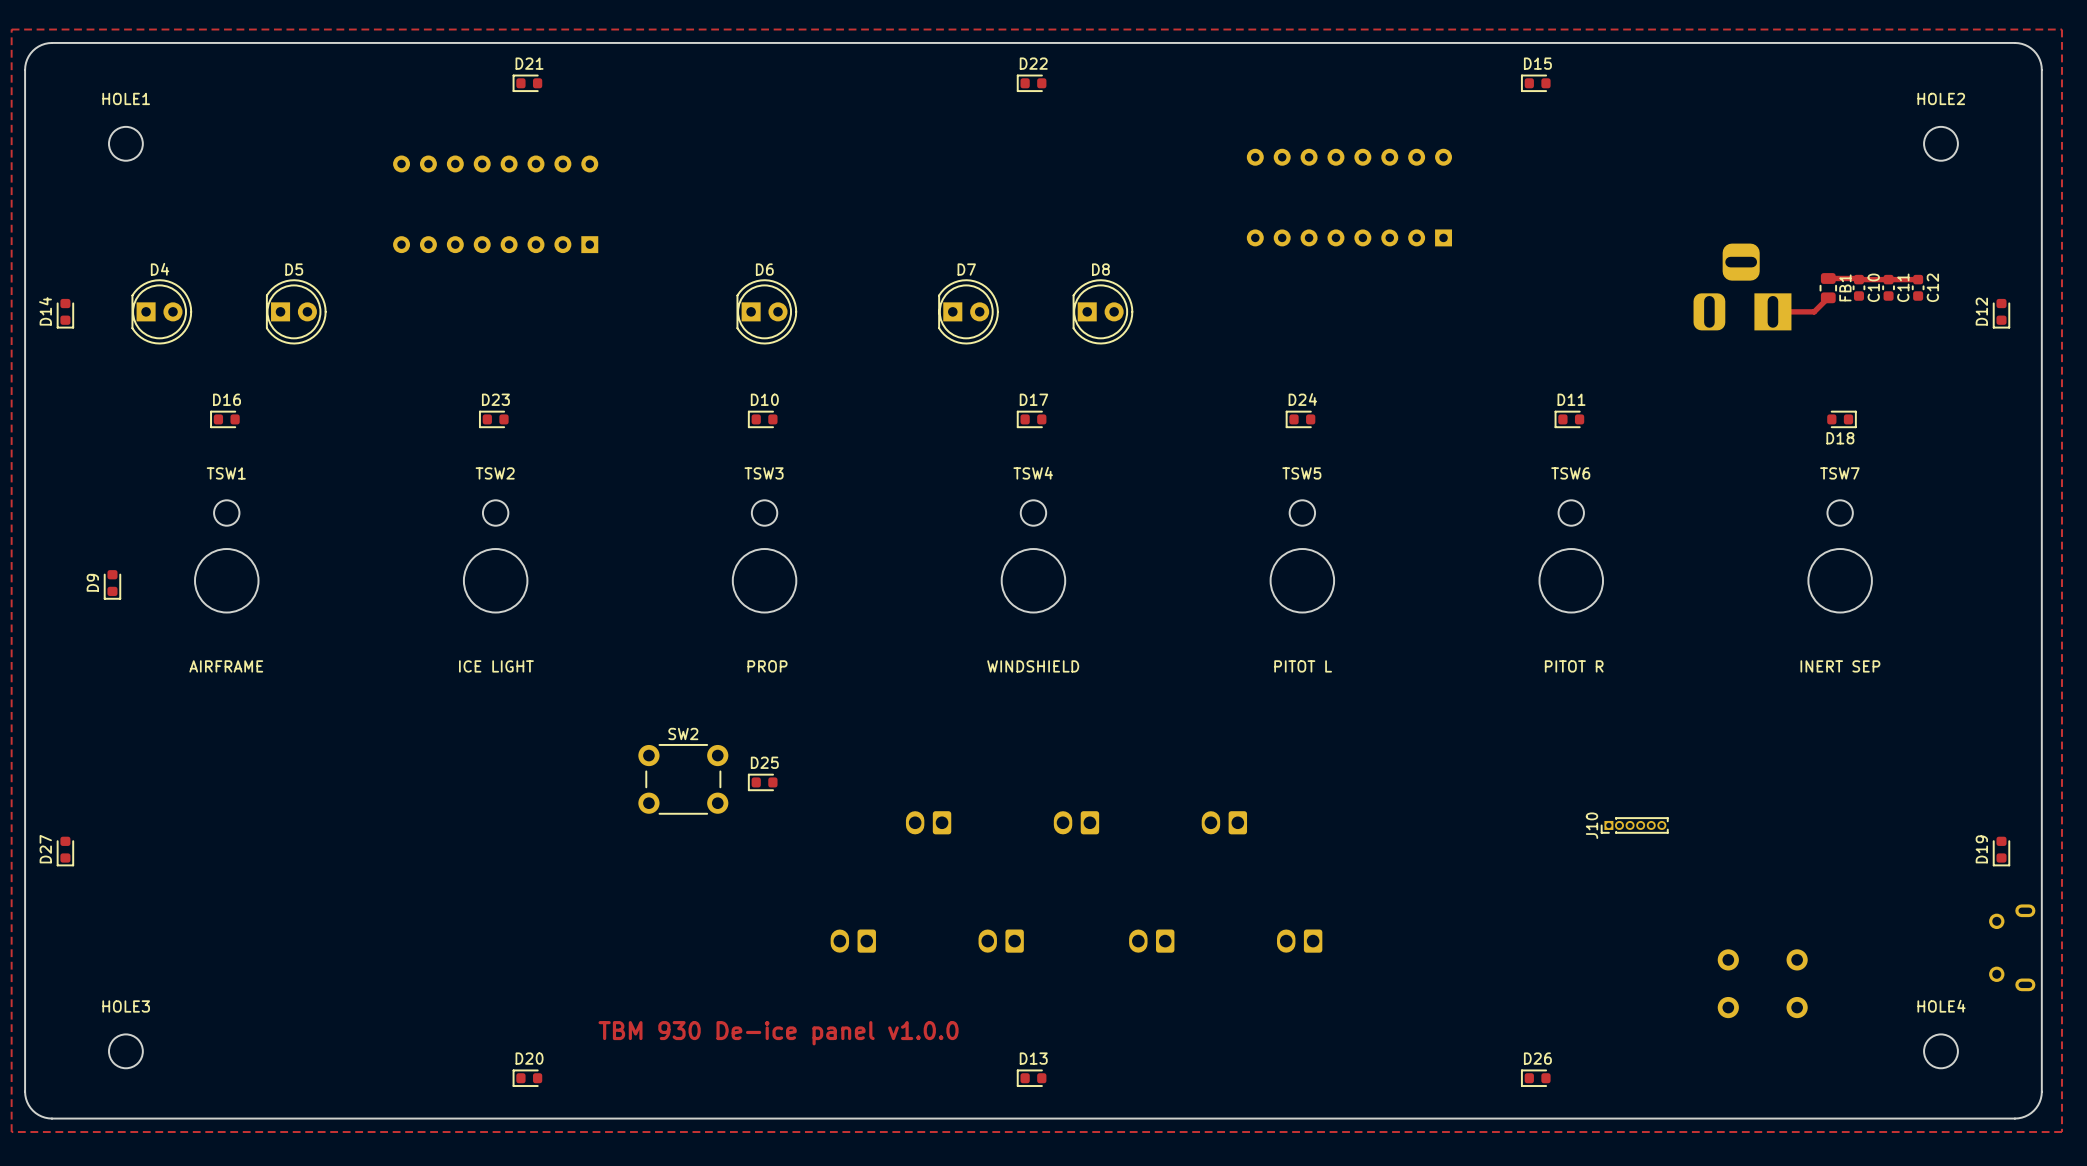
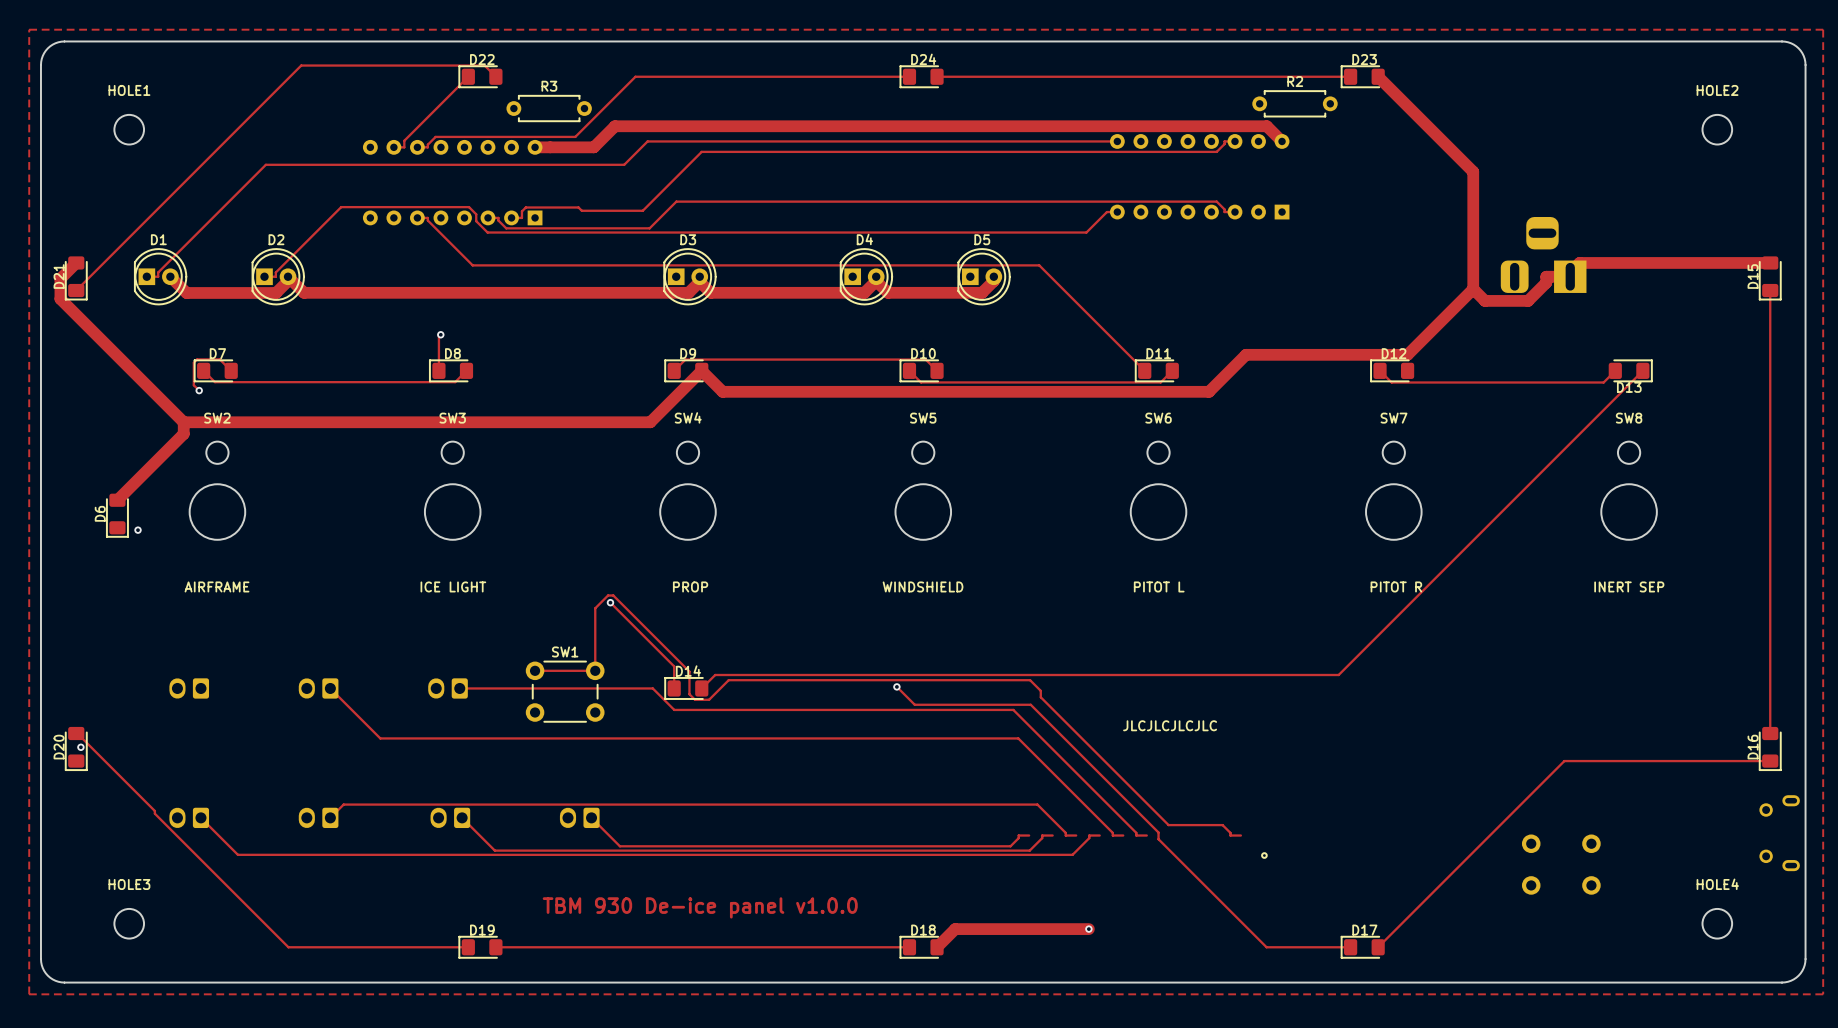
D21 name position: D21 (529, 63) -> D21 (59, 276)
D15 name position: D15 (1537, 63) -> D15 (1753, 276)
D21 footprint: [512, 74, 543, 92] -> [65, 256, 88, 301]
D22 footprint: [1017, 74, 1047, 92] -> [458, 65, 503, 88]
D15 footprint: [1521, 74, 1551, 92] -> [1759, 256, 1782, 301]
track: none -> (468, 76) (404, 140) (404, 147) (393, 147)
track: none -> (495, 76) (484, 65) (301, 65) (76, 290)
track: none -> (909, 76) (635, 76) (575, 136) (435, 136) (427, 144) (427, 147) (417, 147)
track: none -> (937, 76) (1350, 76)
track: none -> (1378, 76) (1473, 171) (1473, 289)
R2: none -> (1294, 103)
R3: none -> (549, 108)
track: none -> (1117, 141) (647, 141) (624, 164) (265, 164) (158, 272) (158, 276) (146, 276)
track: none -> (1235, 141) (1224, 141) (1224, 144) (1216, 151) (701, 151) (642, 210) (581, 210) (578, 207) (525, 207) (521, 211) (521, 217) (511, 217)
track: none -> (1282, 141) (1266, 126) (614, 126) (593, 147) (535, 147)
track: none -> (1117, 212) (1106, 212) (1086, 232) (487, 232) (476, 221) (476, 214) (469, 207) (341, 207) (275, 272) (275, 276) (264, 276)
track: none -> (1235, 212) (1224, 212) (1224, 209) (1216, 201) (676, 201) (649, 228) (506, 228) (498, 220) (498, 217) (488, 217)
track: none -> (417, 217) (427, 217) (427, 220) (472, 265) (1039, 265) (1144, 370)
D4 name: D4 (160, 269) -> D1 (158, 239)
D5 name: D5 (294, 269) -> D2 (276, 239)
D6 name: D6 (764, 269) -> D3 (688, 239)
D7 name: D7 (966, 269) -> D4 (864, 239)
D8 name: D8 (1100, 269) -> D5 (982, 239)
track: (1828, 278) (1918, 279) -> none
C10: (1858, 287) -> none
C11: (1888, 287) -> none
C12: (1918, 287) -> none
FB1: (1828, 288) -> none
track: none -> (76, 262) (60, 278) (60, 298) (183, 422)
track: none -> (1770, 262) (1579, 262) (1565, 276)
track: (1828, 297) (1814, 311) (1772, 311) -> (1473, 289) (1485, 300) (1528, 300) (1546, 282) (1546, 276) (1570, 276)
D14 footprint: [57, 298, 74, 329] -> [664, 677, 709, 700]
D12 footprint: [1993, 298, 2010, 329] -> [1370, 359, 1415, 382]
D14 name position: D14 (45, 311) -> D14 (688, 671)
track: none -> (170, 276) (186, 292) (276, 292) (290, 278)
track: none -> (288, 276) (304, 292) (688, 292) (699, 281)
track: none -> (993, 276) (993, 281) (982, 292) (887, 292) (876, 281)
D12 name position: D12 (1981, 311) -> D12 (1394, 353)
track: none -> (876, 281) (864, 292) (710, 292) (699, 281)
track: none -> (1473, 289) (1407, 354) (1246, 354) (1209, 391) (722, 391) (701, 370) (650, 422) (183, 422)
track: none -> (1770, 290) (1770, 733)
track: none -> (440, 334) (438, 336) (438, 370)
via: none -> (440, 334)
D16 name position: D16 (227, 399) -> D16 (1753, 747)
D16 footprint: [210, 411, 240, 428] -> [1759, 726, 1782, 771]
D23 footprint: [479, 411, 509, 428] -> [1341, 65, 1385, 88]
D10 footprint: [748, 411, 778, 428] -> [899, 359, 944, 382]
D17 footprint: [1017, 411, 1047, 428] -> [1341, 936, 1385, 959]
D24 footprint: [1286, 411, 1316, 428] -> [899, 65, 944, 88]
D11 footprint: [1554, 411, 1585, 428] -> [1135, 359, 1179, 382]
D18 footprint: [1827, 411, 1857, 428] -> [899, 936, 944, 959]
track: none -> (203, 370) (214, 382) (455, 382) (466, 370)
D7: none -> (215, 370)
track: none -> (231, 370) (219, 359) (197, 359) (193, 362) (193, 385) (199, 390)
D8: none -> (451, 370)
track: none -> (674, 370) (685, 359) (925, 359) (937, 370)
track: none -> (909, 370) (921, 382) (1160, 382) (1172, 370)
track: none -> (1380, 370) (1391, 382) (1603, 382) (1615, 370)
track: none -> (1642, 370) (1338, 675) (715, 675) (701, 688)
D18 name position: D18 (1840, 438) -> D18 (923, 930)
via: none -> (199, 390)
TSW1 name: TSW1 (226, 473) -> SW2 (217, 418)
TSW2 name: TSW2 (495, 473) -> SW3 (452, 418)
TSW3 name: TSW3 (764, 473) -> SW4 (688, 417)
TSW4 name: TSW4 (1033, 473) -> SW5 (923, 418)
TSW5 name: TSW5 (1301, 473) -> SW6 (1158, 418)
TSW6 name: TSW6 (1570, 473) -> SW7 (1394, 418)
TSW7 name: TSW7 (1839, 473) -> SW8 (1629, 418)
track: none -> (183, 422) (183, 433) (117, 500)
D9 footprint: [104, 570, 121, 600] -> [664, 359, 709, 382]
D9 name position: D9 (92, 582) -> D9 (688, 353)
D6: none -> (117, 515)
via: none -> (138, 530)
track: none -> (610, 602) (674, 666) (674, 688)
via: none -> (610, 602)
track: none -> (535, 670) (595, 670) (595, 608) (608, 595) (613, 595) (689, 671) (689, 694) (695, 699) (709, 699) (728, 680) (1030, 680) (1040, 690) (1040, 697) (1168, 825) (1222, 825) (1230, 832) (1230, 835) (1240, 835)
SW2: (683, 779) -> none
track: none -> (896, 686) (914, 704) (1030, 704) (1158, 832) (1158, 839) (1266, 947) (1350, 947)
via: none -> (896, 686)
part: none -> (189, 688)
part: none -> (318, 688)
track: none -> (330, 688) (380, 738) (1018, 738) (1112, 832) (1112, 835) (1123, 835)
part: none -> (448, 688)
track: none -> (459, 688) (652, 688) (674, 709) (1013, 709) (1136, 832) (1136, 835) (1146, 835)
D25: (762, 782) -> none
SW1: none -> (565, 691)
part: (928, 822) -> none
part: (1076, 822) -> none
part: (1224, 822) -> none
text: none -> JLCJLCJLCJLC (1170, 725)
J10: (1634, 825) -> none
track: none -> (76, 733) (288, 947) (468, 947)
D19 footprint: [1993, 836, 2010, 867] -> [458, 936, 503, 959]
via: none -> (80, 747)
D19 name position: D19 (1981, 849) -> D19 (482, 930)
D27: (65, 851) -> none
track: none -> (1770, 761) (1564, 761) (1378, 947)
part: none -> (189, 817)
track: none -> (200, 817) (237, 854) (1072, 854) (1089, 838) (1089, 835) (1099, 835)
part: none -> (318, 817)
track: none -> (330, 817) (343, 804) (1037, 804) (1065, 832) (1065, 835) (1076, 835)
part: none -> (450, 817)
track: none -> (462, 817) (494, 850) (1029, 850) (1042, 838) (1042, 835) (1052, 835)
part: none -> (579, 817)
track: none -> (591, 817) (619, 846) (1010, 846) (1018, 838) (1018, 835) (1029, 835)
part: (853, 941) -> none
part: (1001, 941) -> none
part: (1151, 941) -> none
part: (1299, 941) -> none
drawing: none -> [1261, 852, 1268, 859]
track: none -> (1088, 929) (955, 929) (937, 947)
via: none -> (1088, 929)
D20 name position: D20 (529, 1058) -> D20 (59, 747)
D13 name position: D13 (1033, 1058) -> D13 (1629, 387)
D20 footprint: [512, 1069, 543, 1087] -> [65, 726, 88, 771]
D13 footprint: [1017, 1069, 1047, 1087] -> [1608, 359, 1653, 382]
track: none -> (495, 947) (909, 947)
D26: (1535, 1078) -> none

